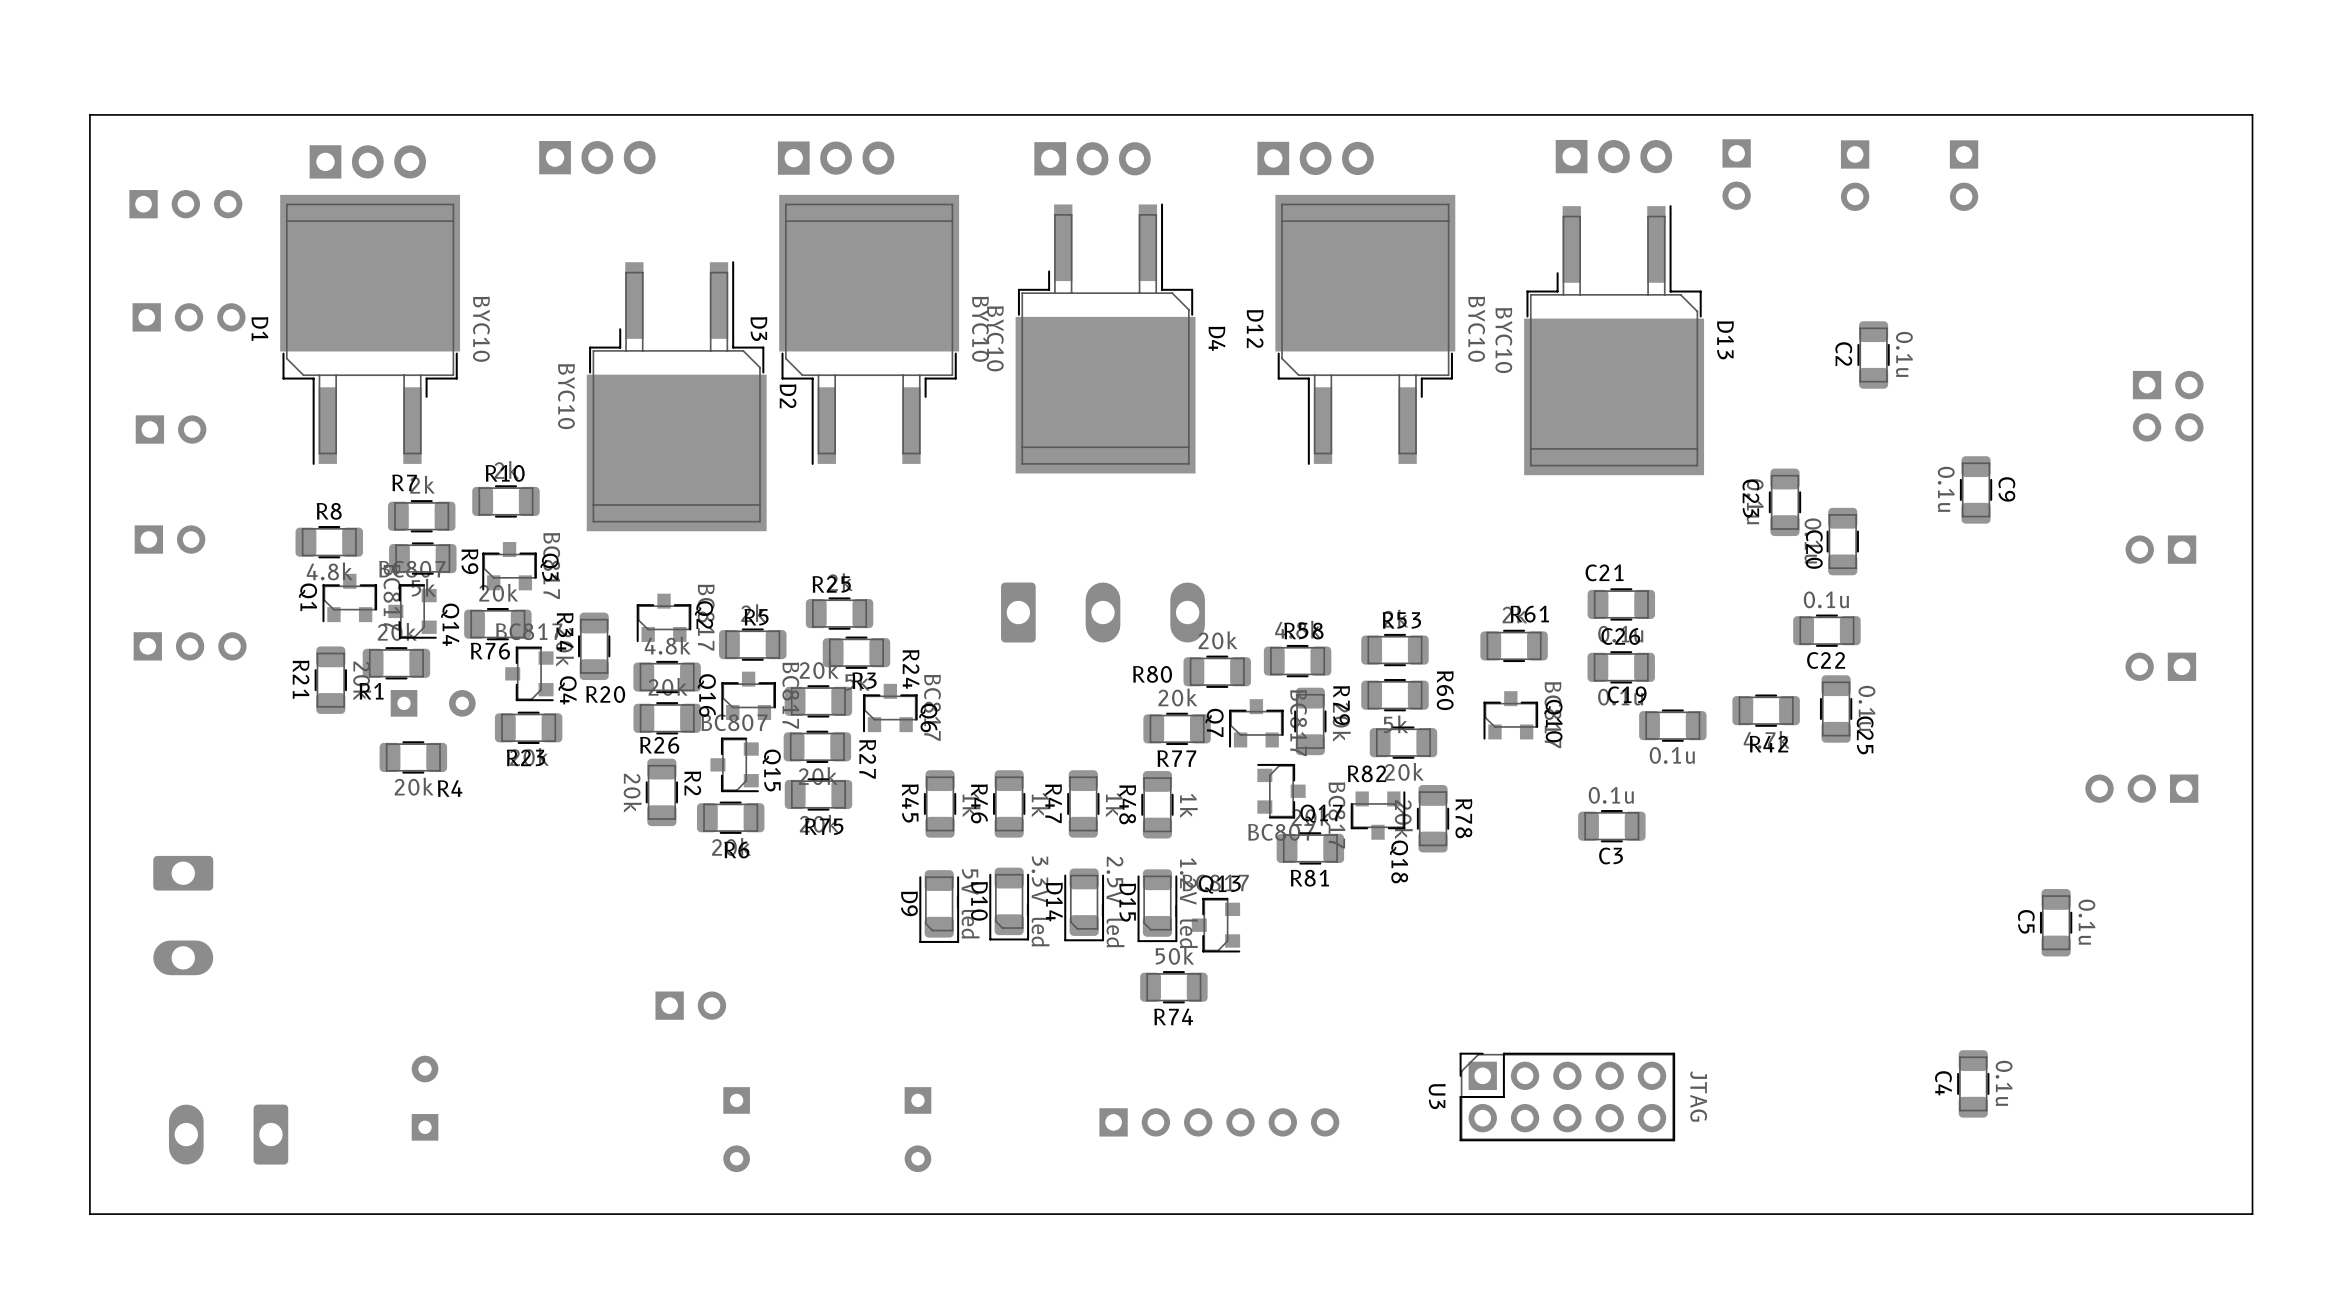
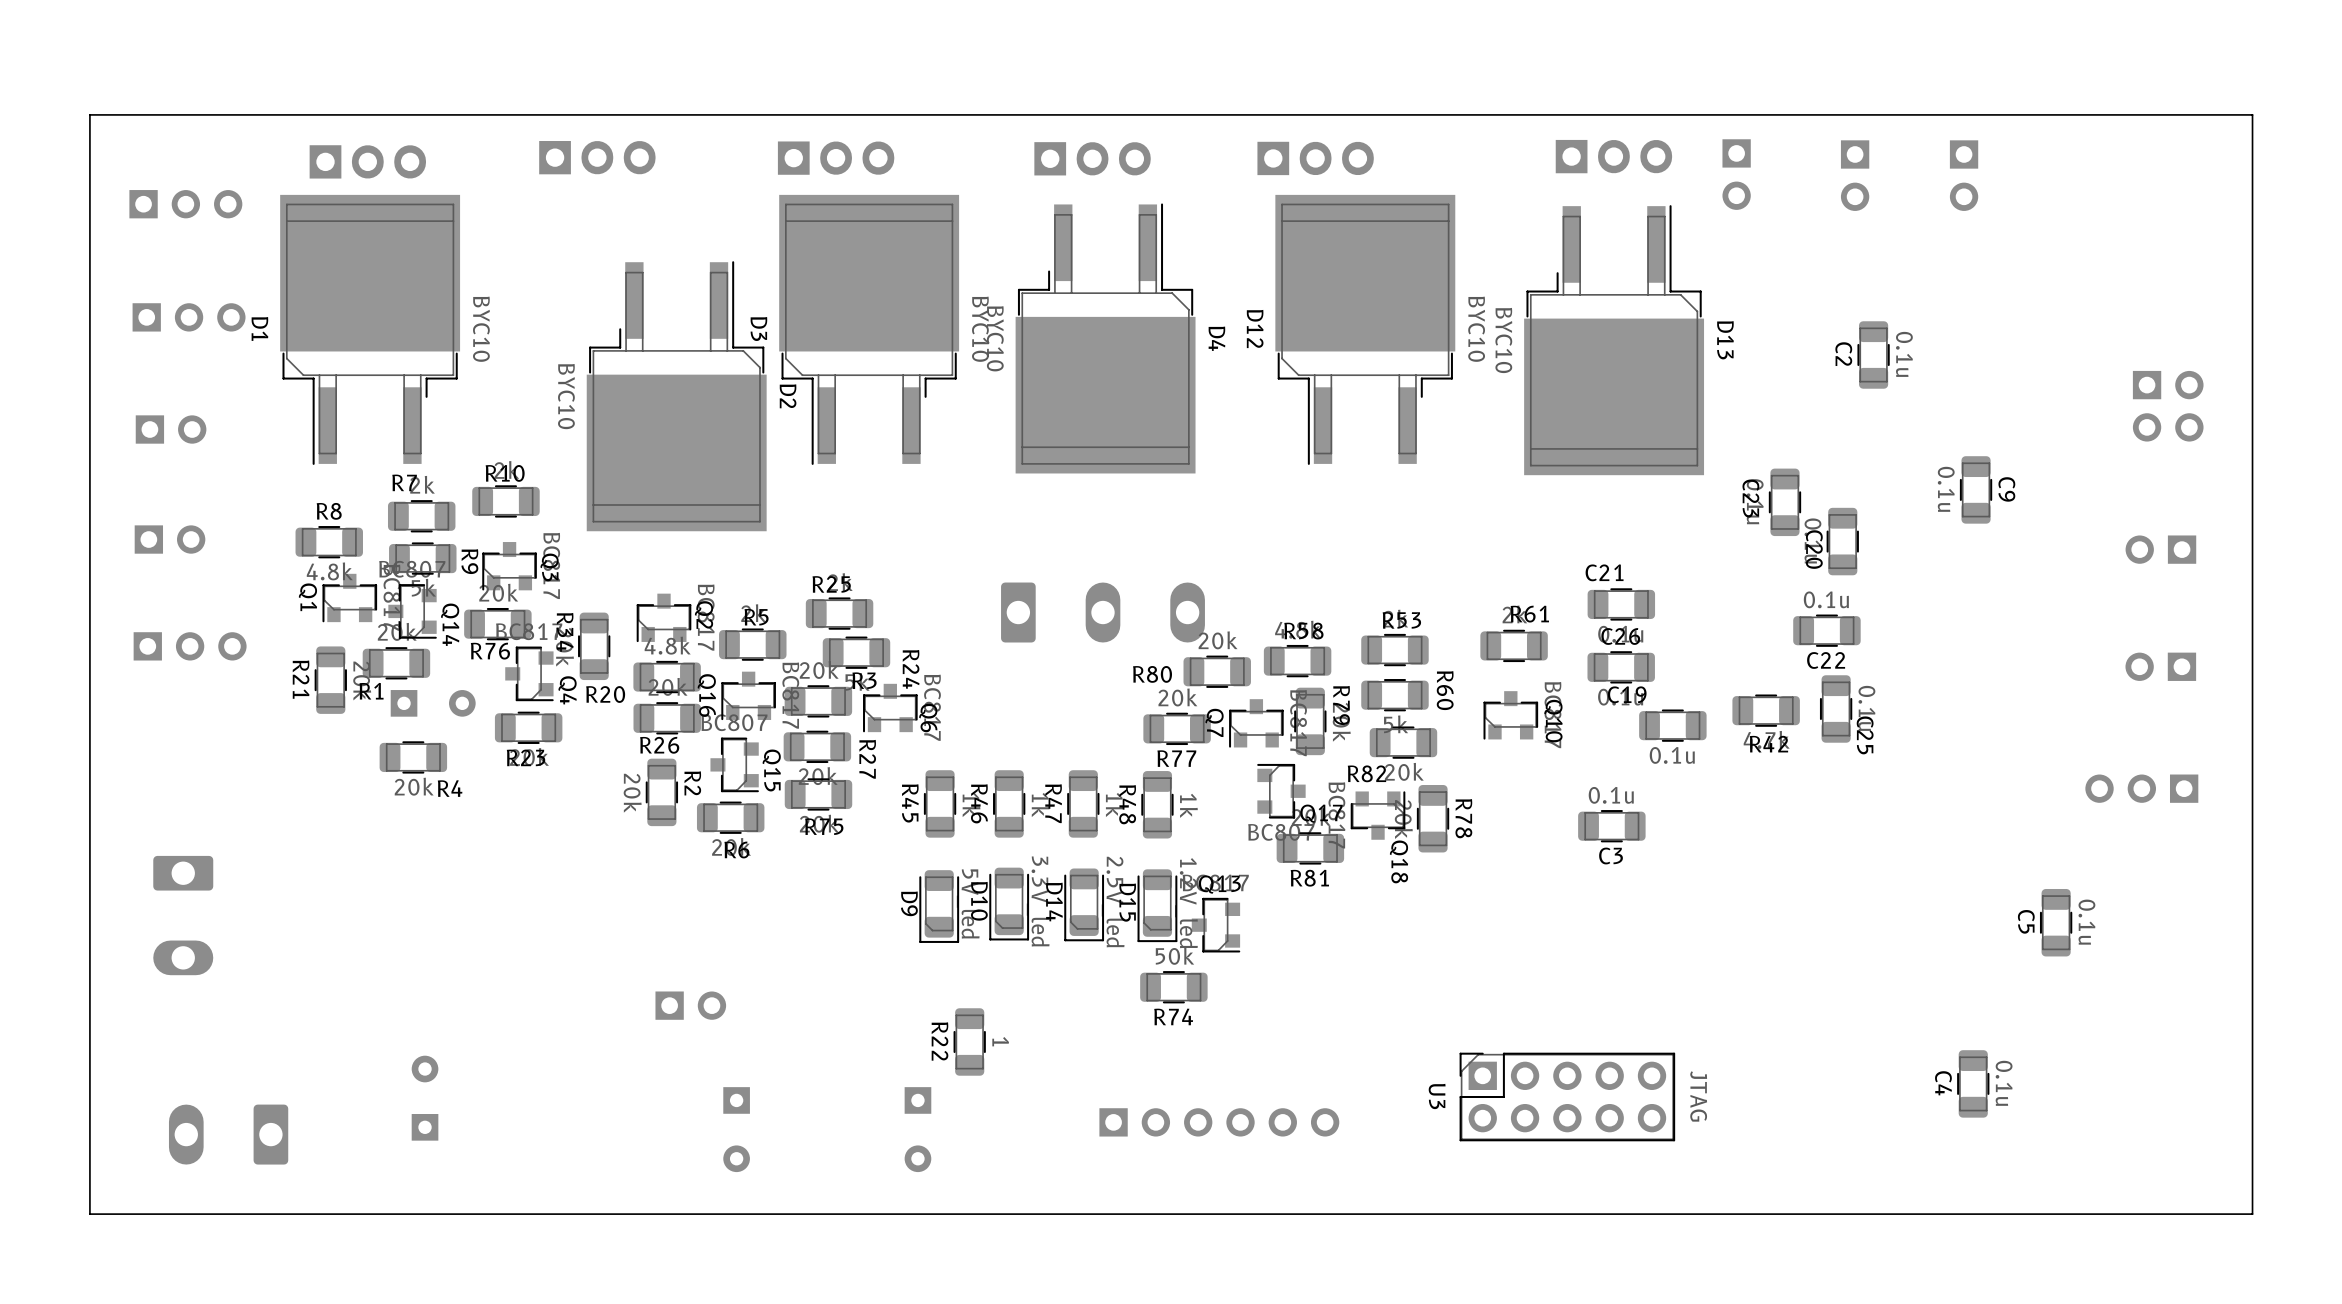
R22: none -> 1 (969, 1041)

